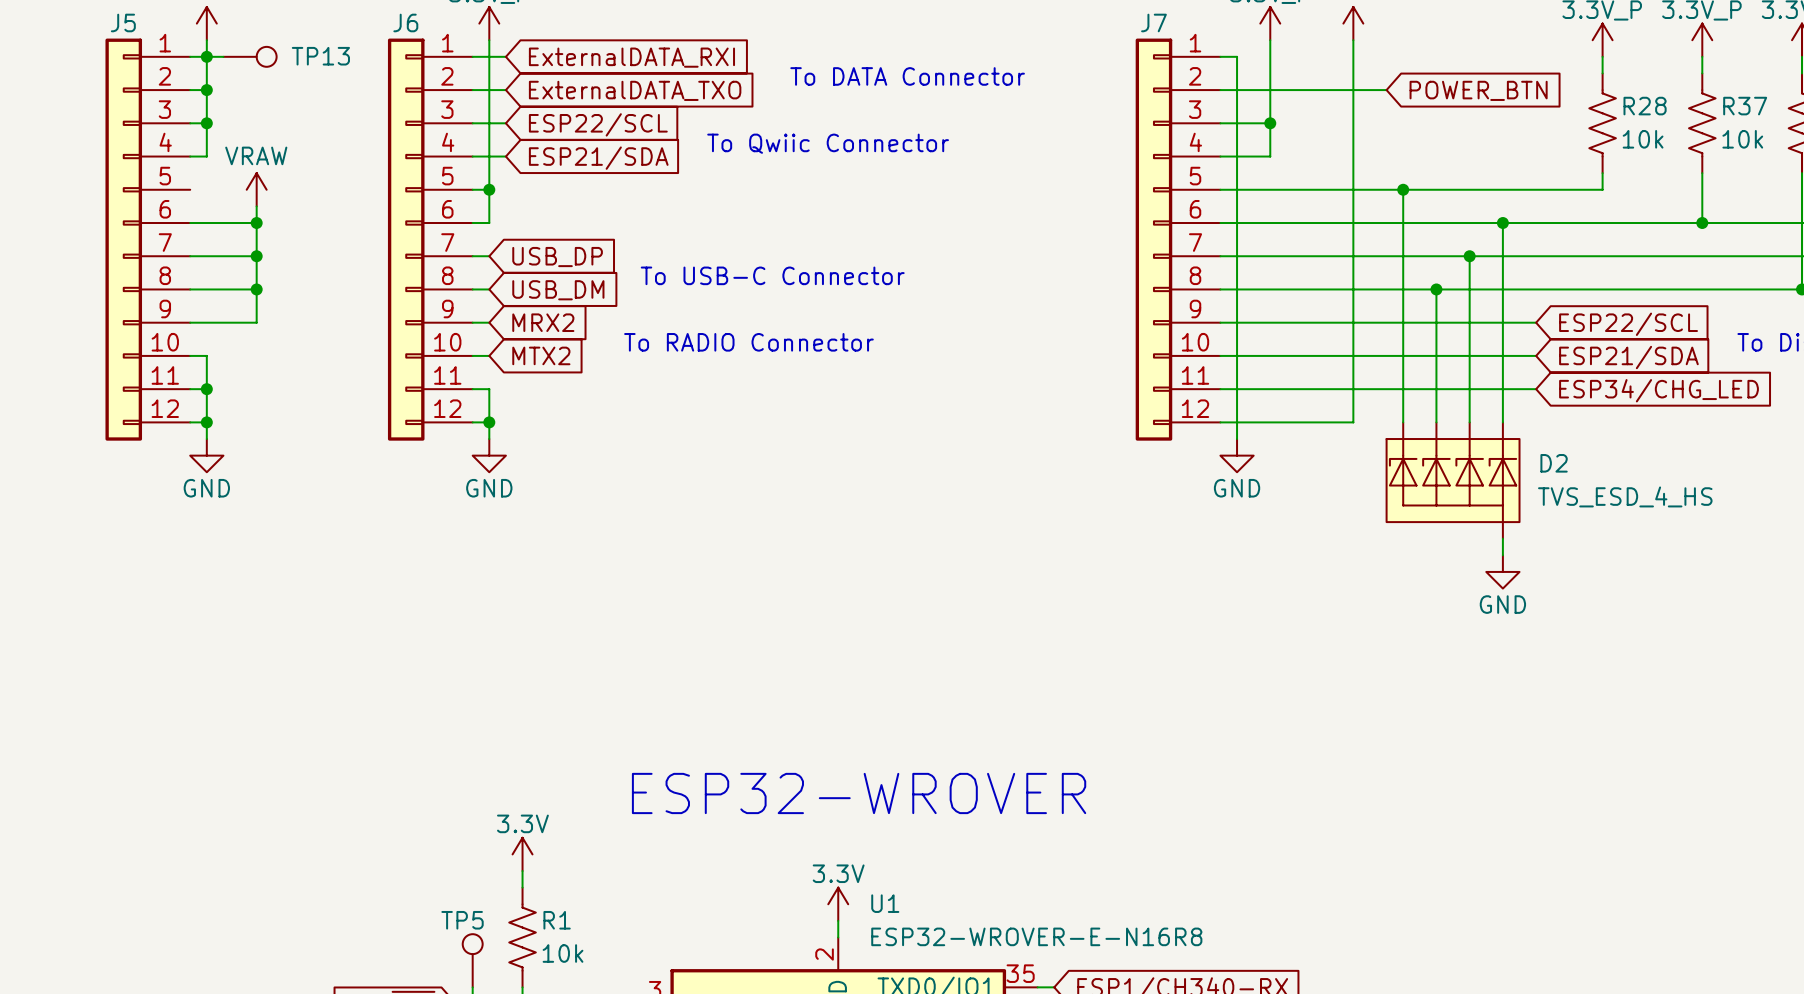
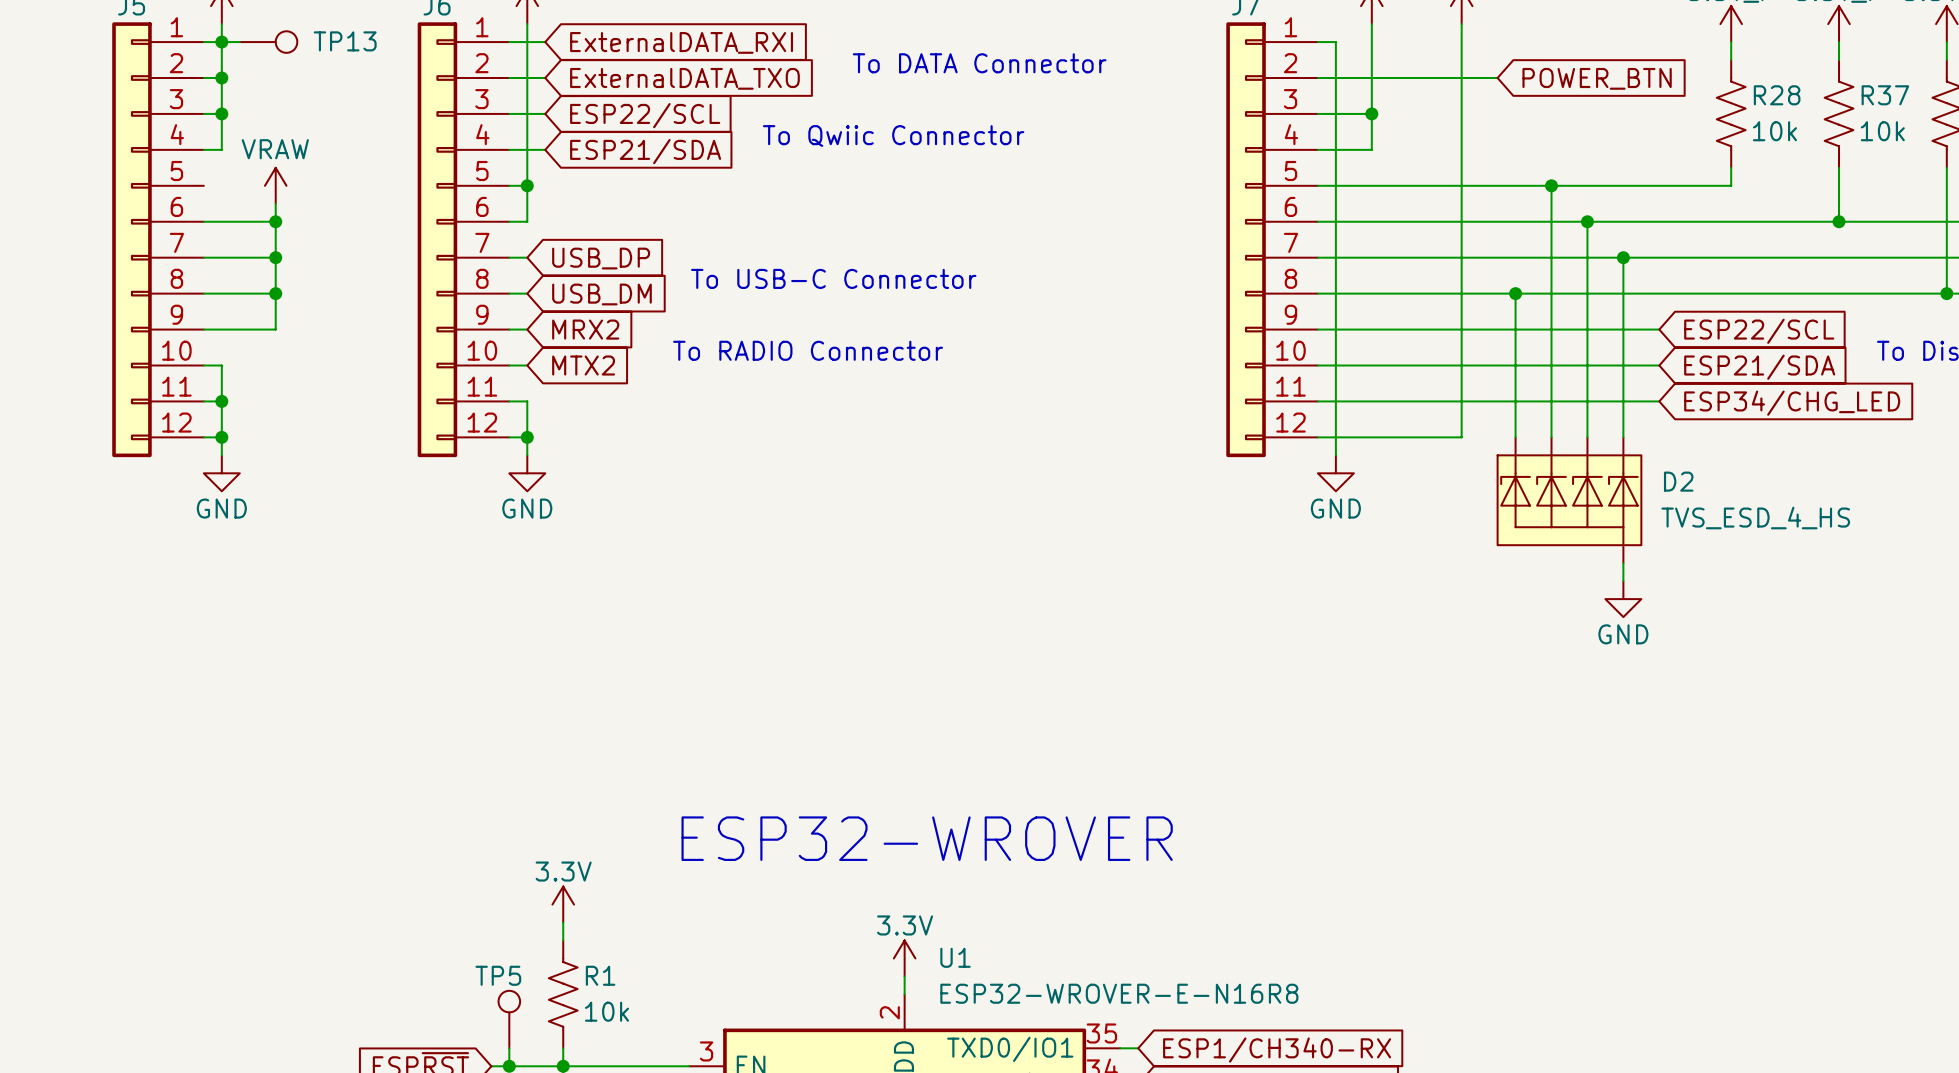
wire: (1403, 189) (1403, 289) -> (1551, 185) (1551, 293)
junction position: (1403, 189) -> (1551, 185)
junction: none -> (1587, 221)
wire: (1502, 223) (1502, 256) -> (1587, 221) (1587, 257)
junction: (1502, 223) -> none
junction: (1469, 256) -> none
junction: none -> (1623, 257)
junction position: (1436, 289) -> (1515, 293)

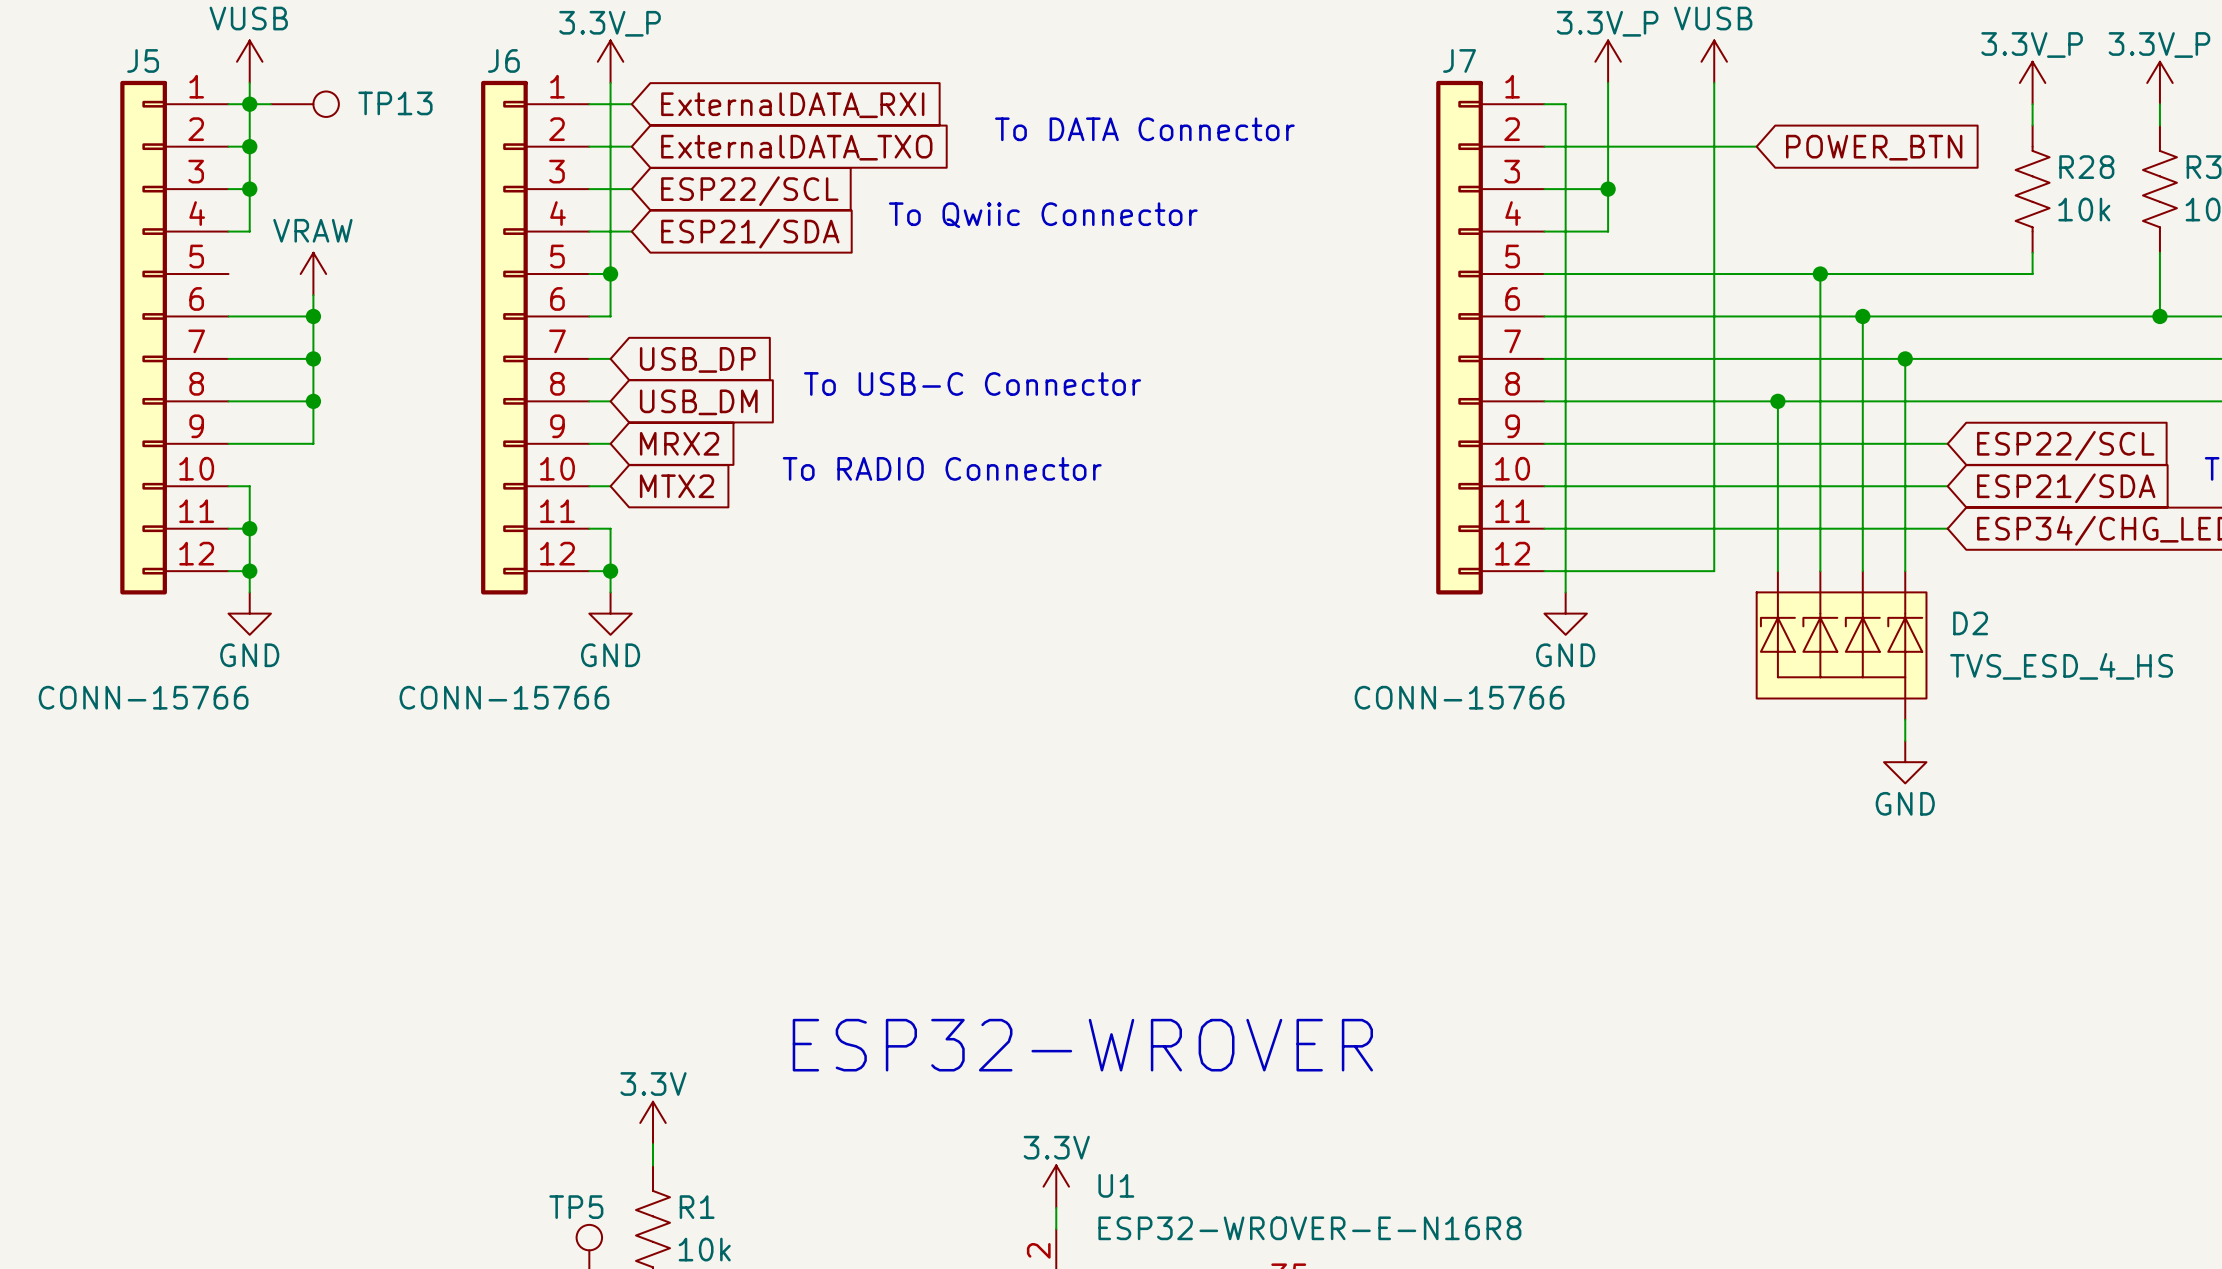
J5 text: none -> CONN-15766 (143, 697)
J6 text: none -> CONN-15766 (504, 697)
J7 text: none -> CONN-15766 (1459, 697)

